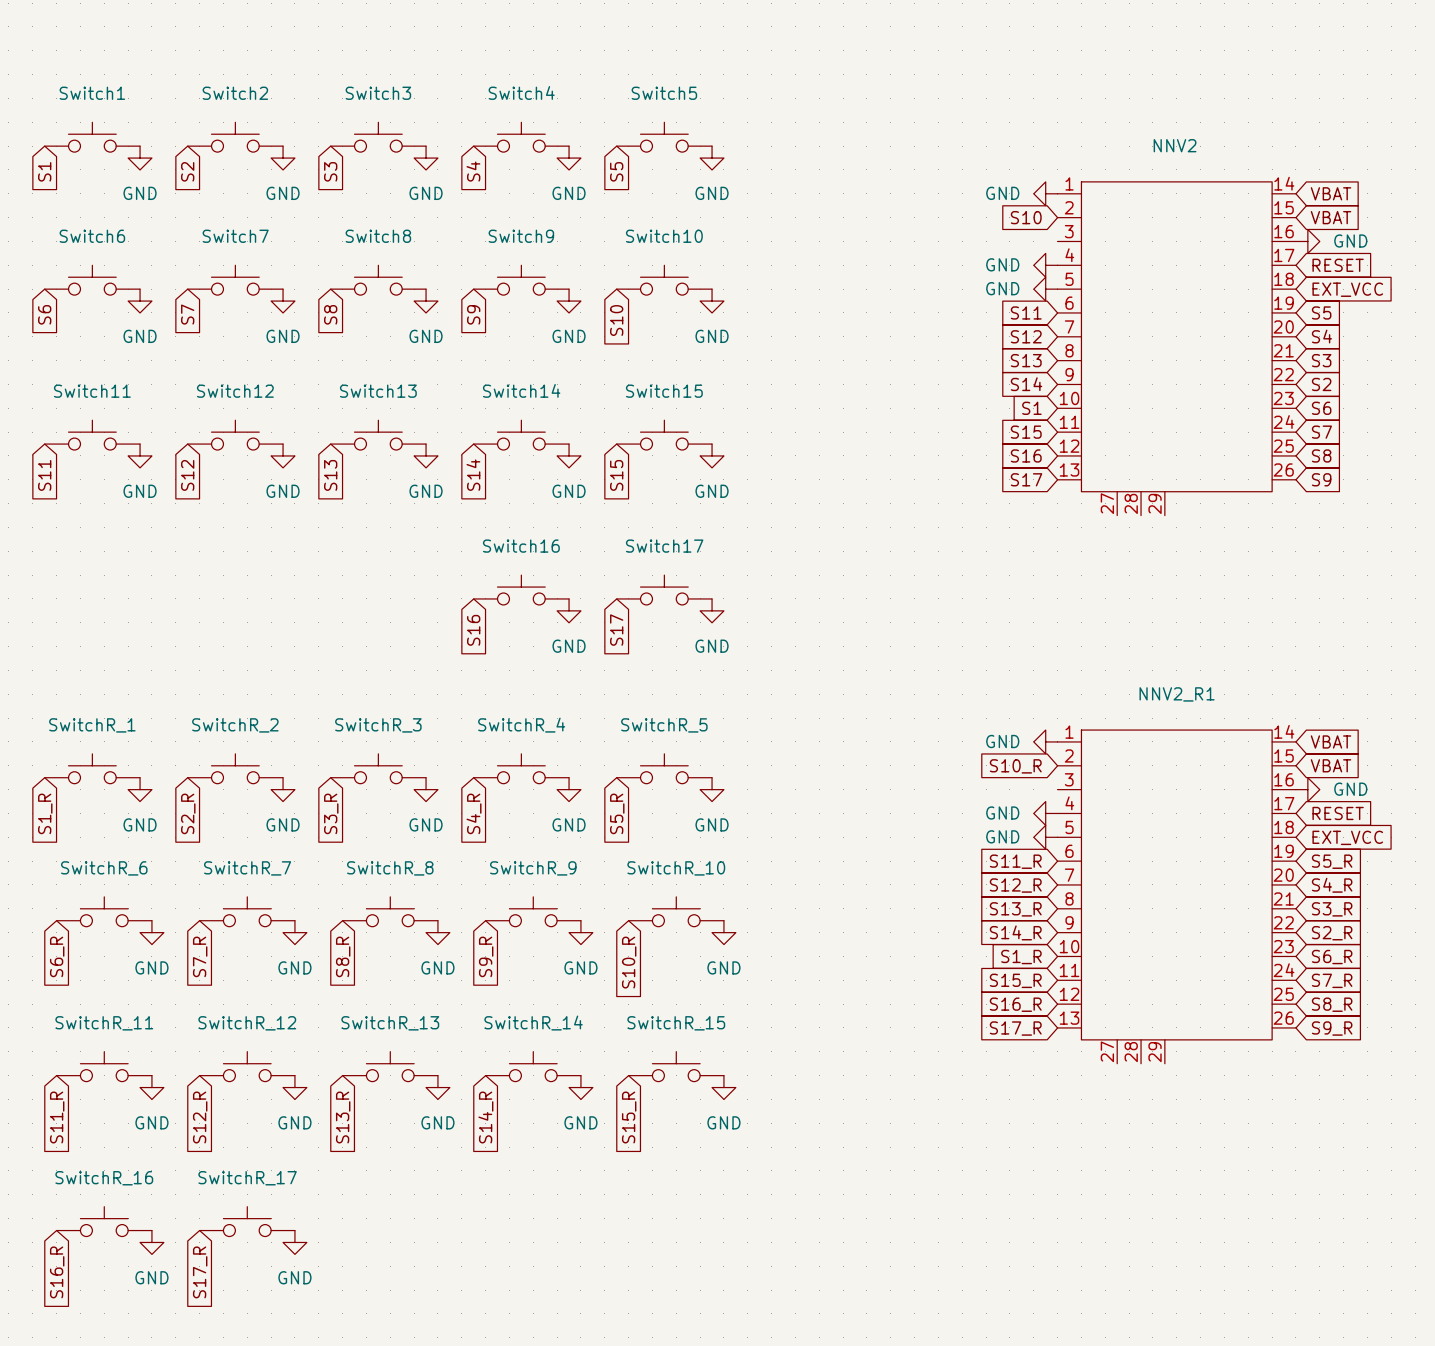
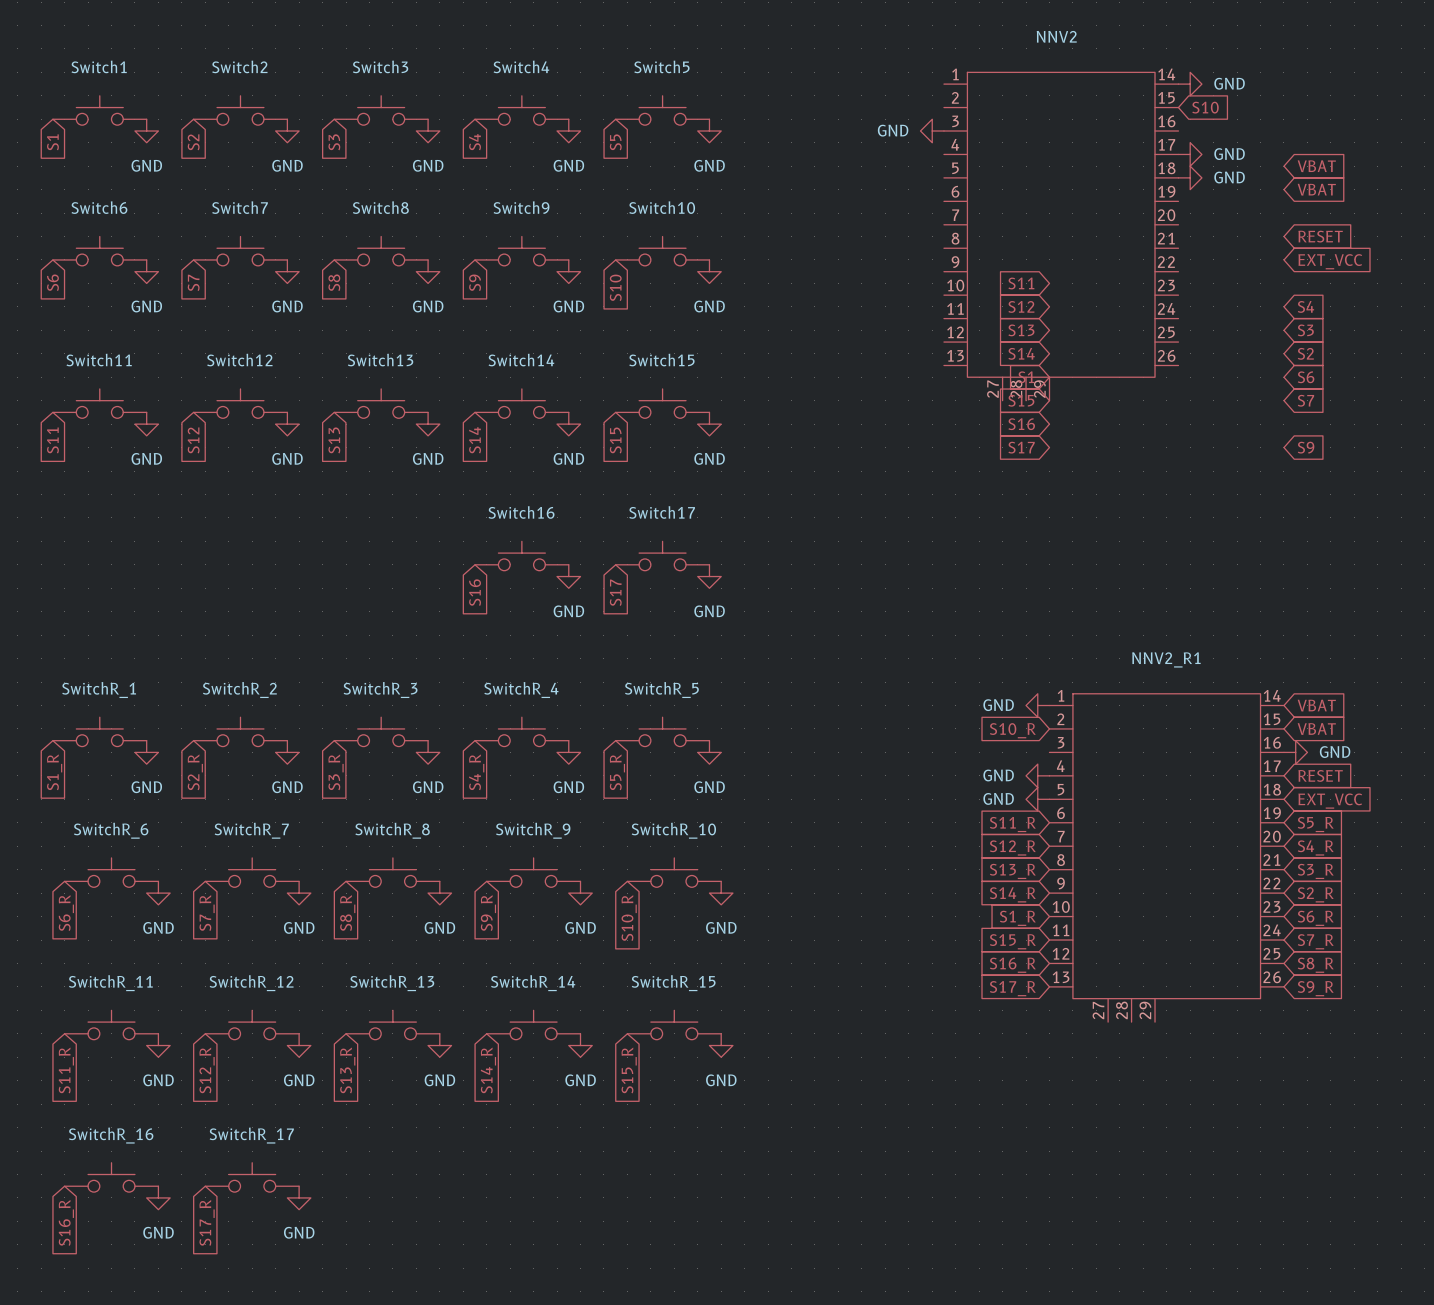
power symbol: none -> GND (1190, 84)
power symbol: none -> GND (932, 131)
power symbol: none -> GND (1190, 154)
power symbol: GND (1045, 193) -> none
power symbol: none -> GND (1190, 177)
global label rotation: 0° (1026, 217) -> 180° (1205, 107)
global label position: S10 (1026, 217) -> S10 (1205, 107)
power symbol: GND (1307, 241) -> none
power symbol: GND (1045, 265) -> none
power symbol: GND (1045, 289) -> none
global label: S5 (1321, 312) -> none
NNV2 position: (1176, 348) -> (1061, 236)
global label: S8 (1321, 455) -> none

